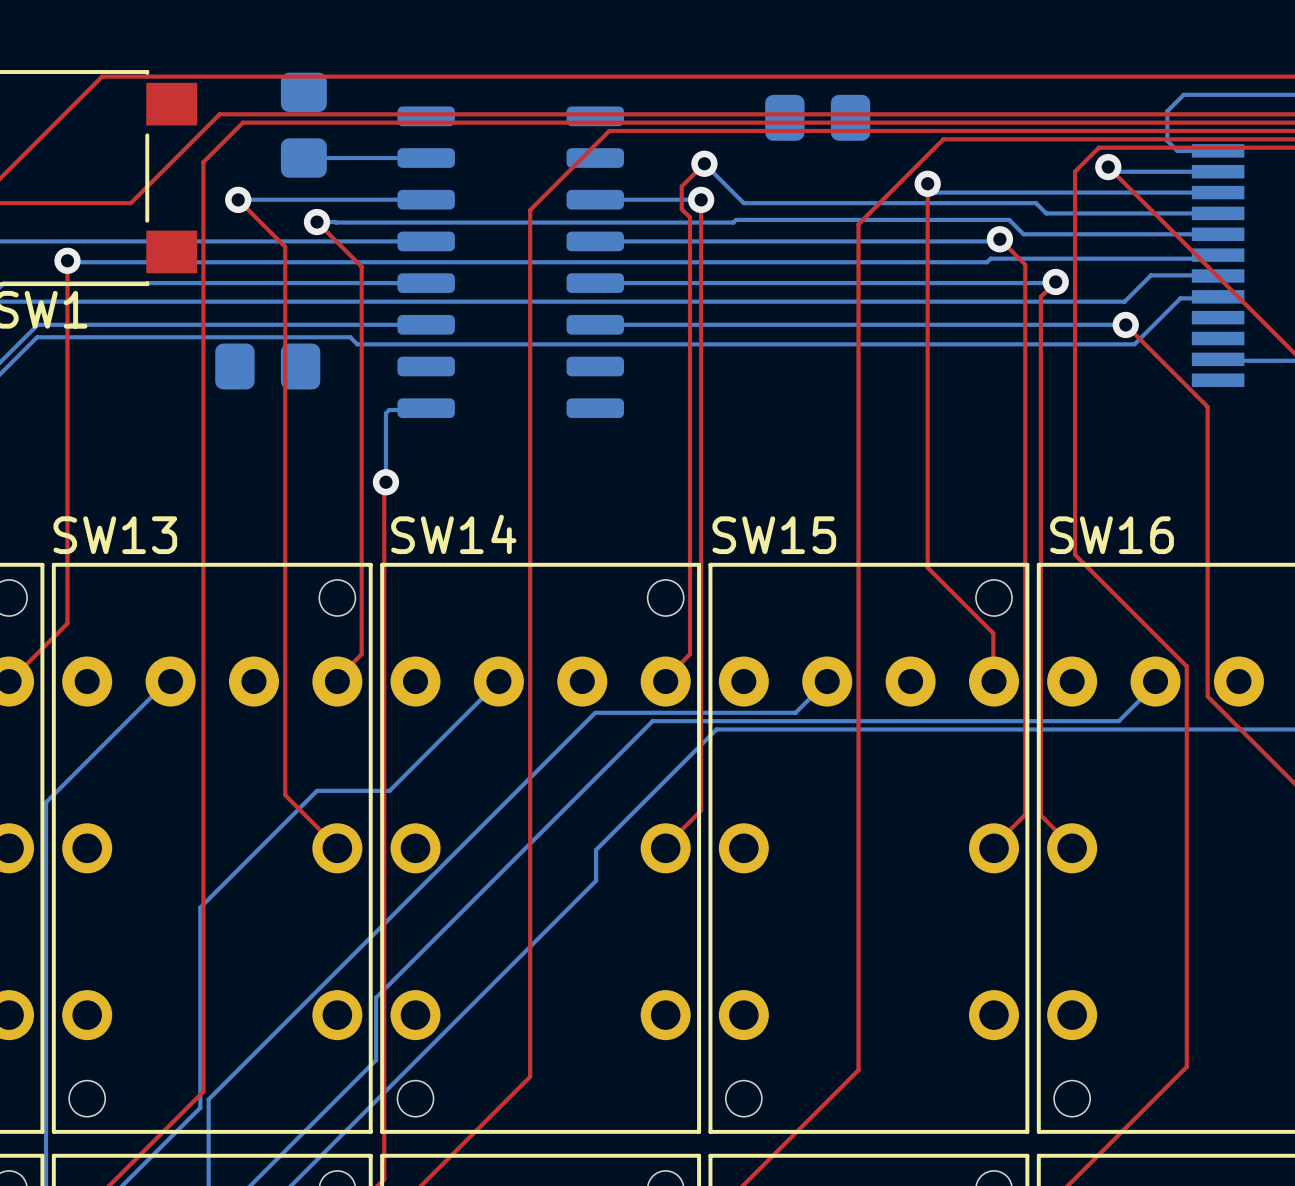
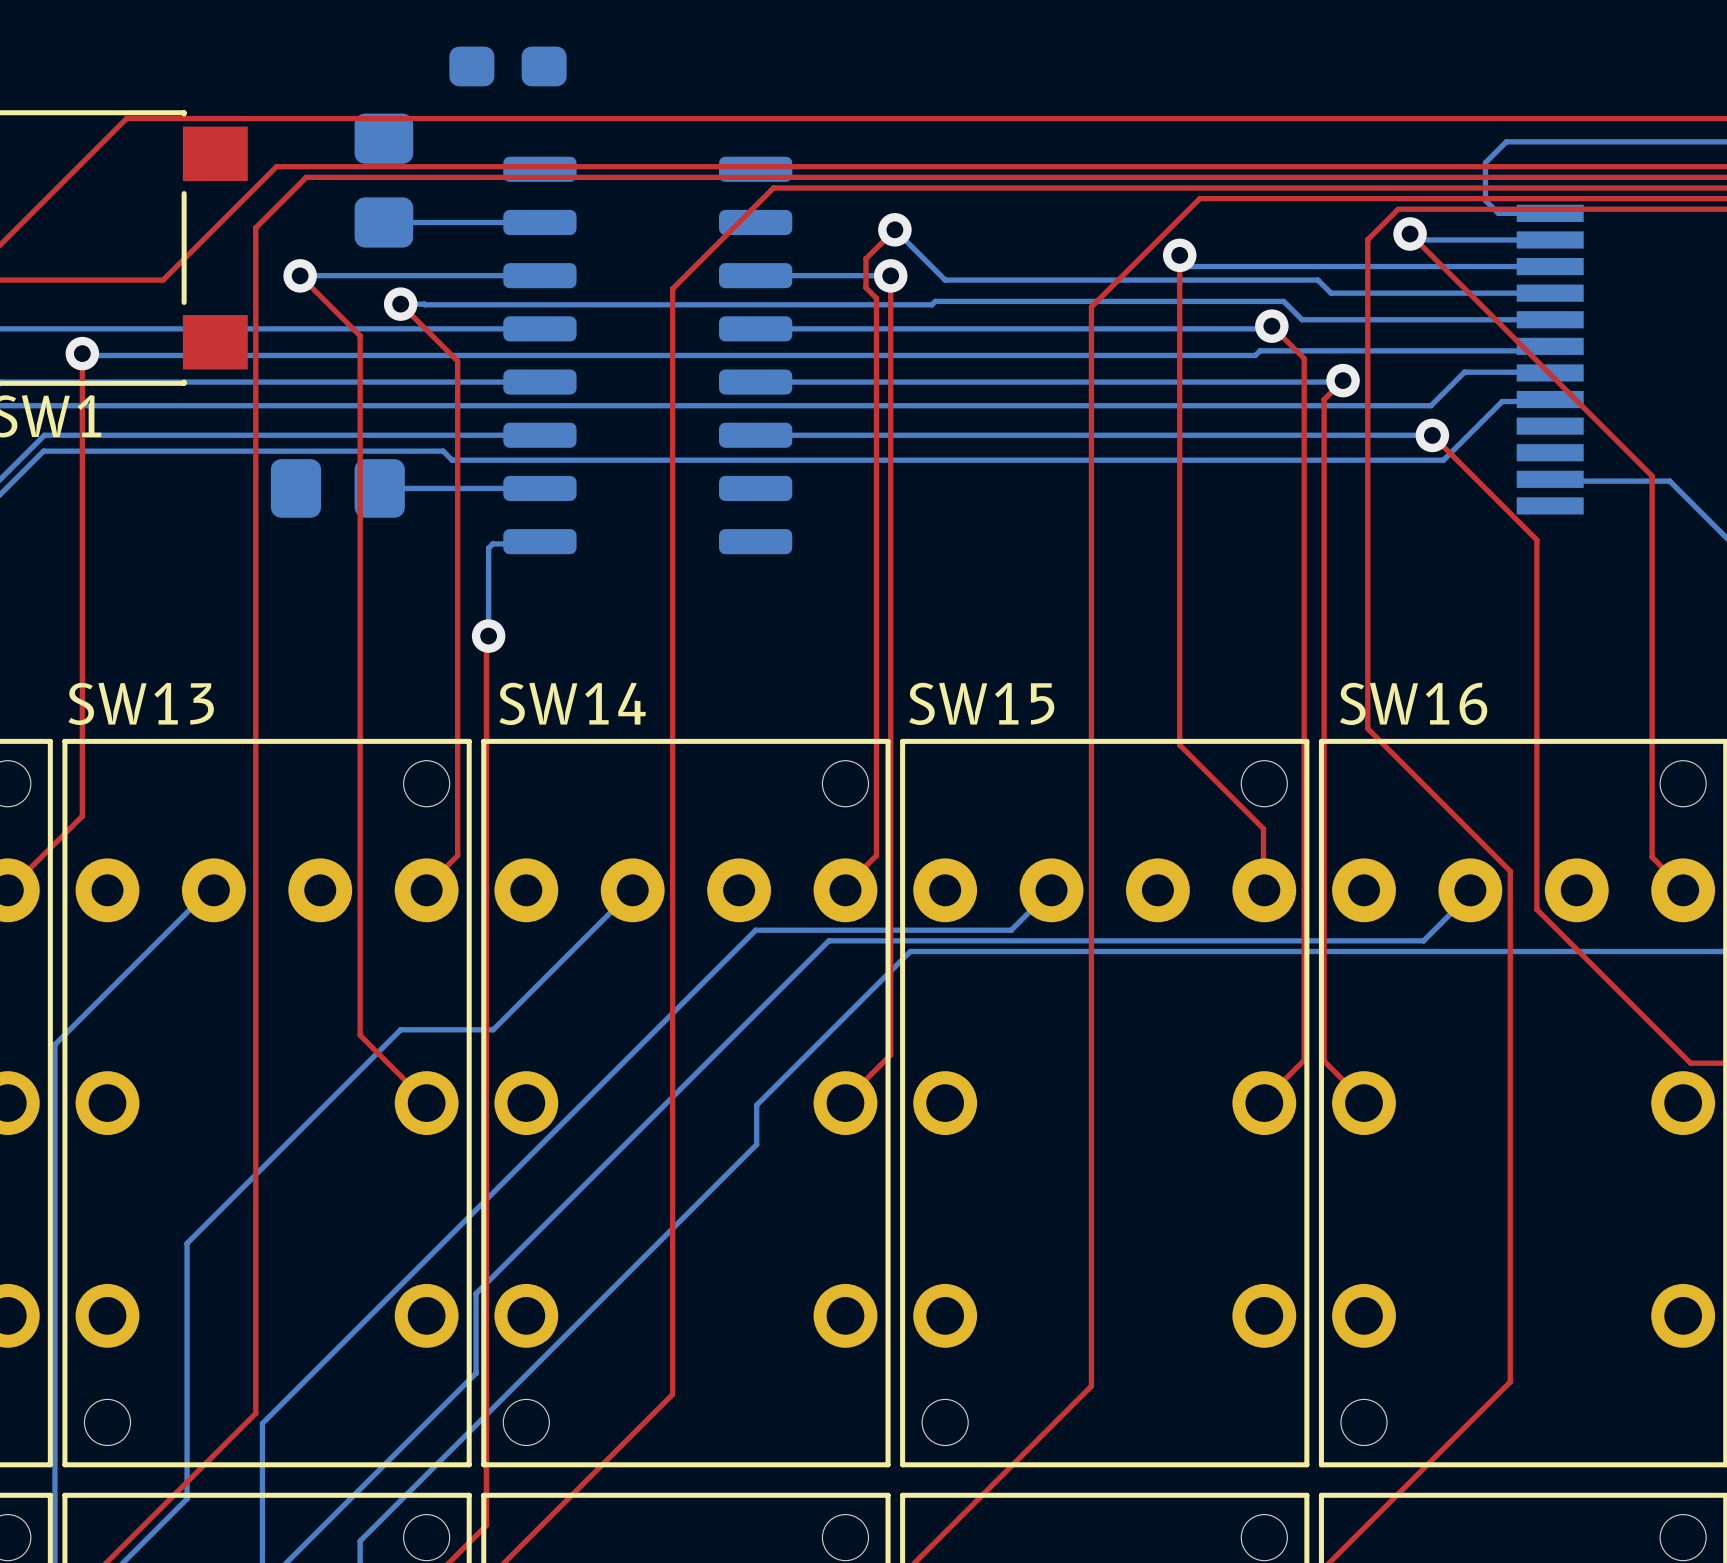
part: none -> (508, 66)
part: (817, 117) -> none
bottom track: none -> (539, 488) (375, 489)
bottom track: (200, 907) (200, 1107) (149, 1158) -> (251, 1178) (187, 1243) (187, 1498)

